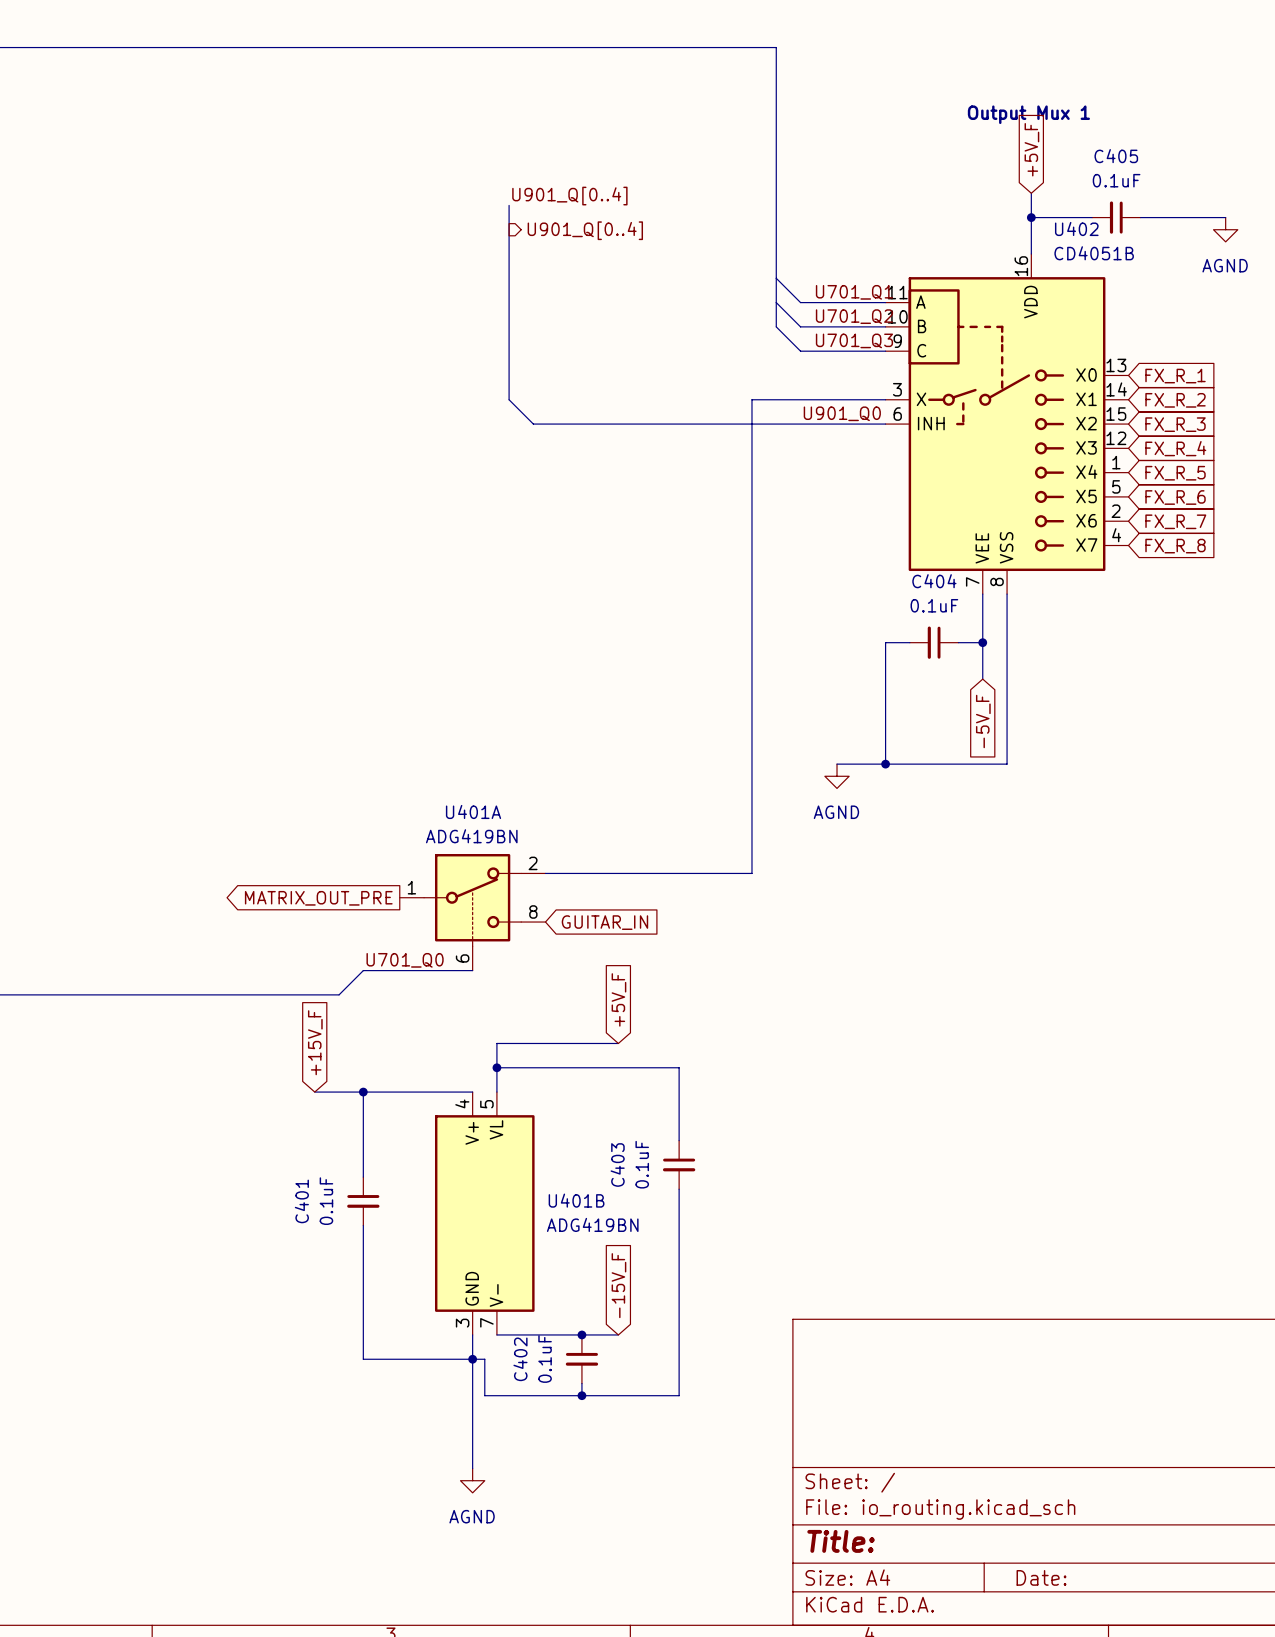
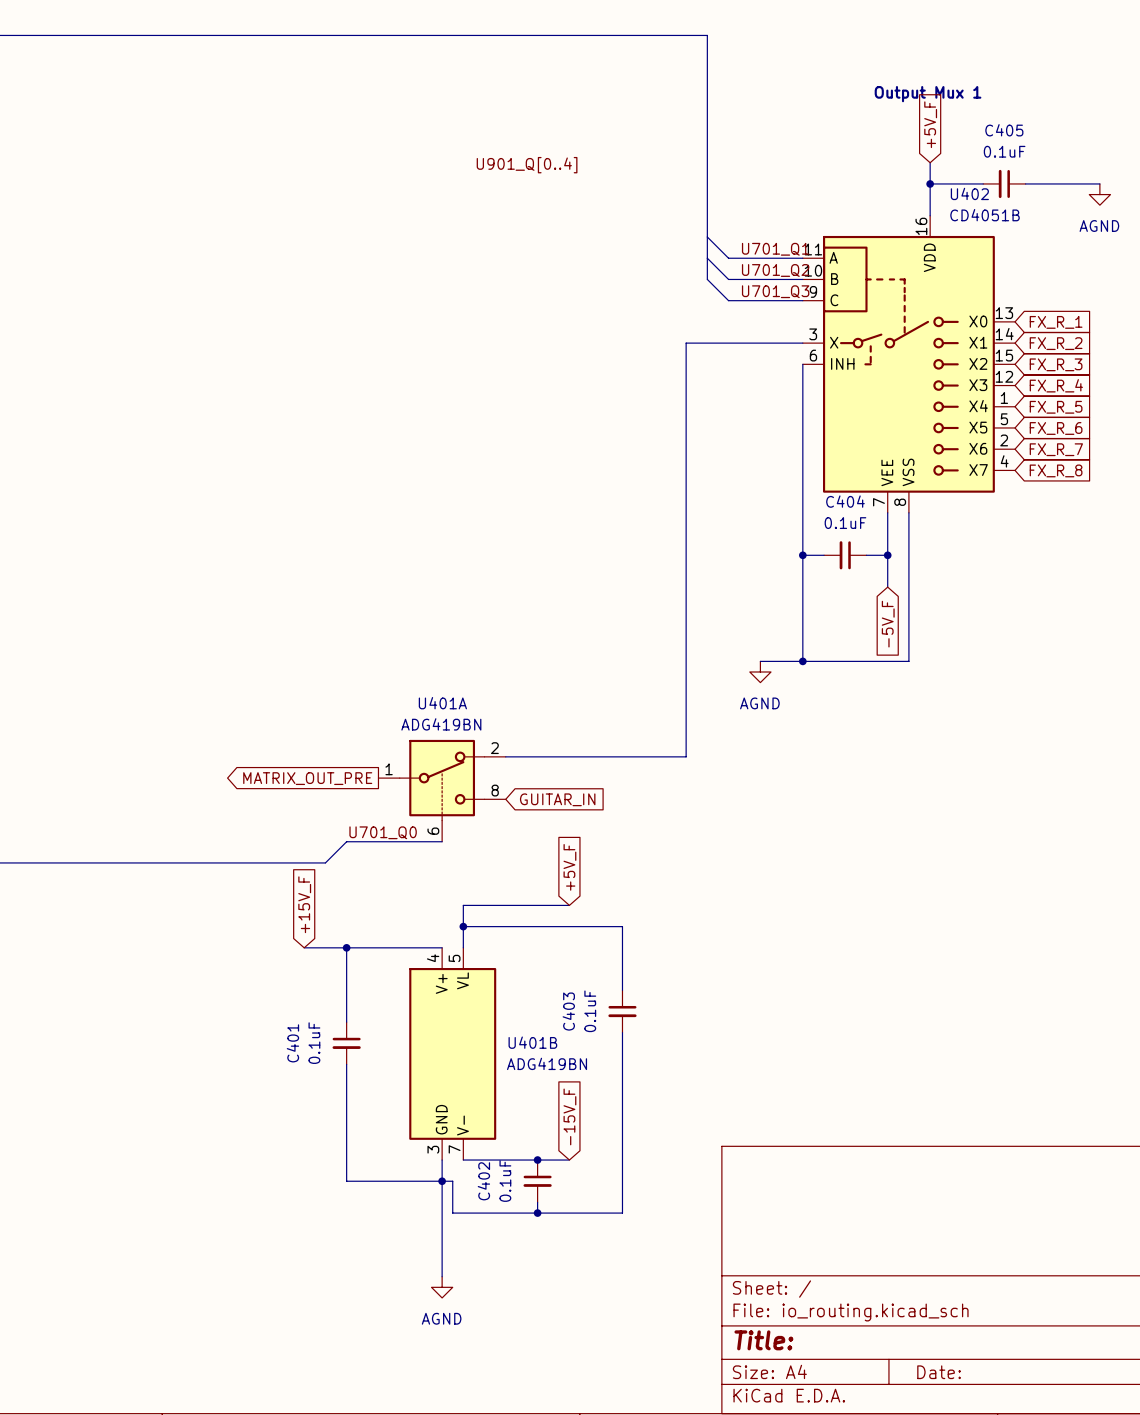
bus: (509, 205) (509, 399) -> none
hierarchical label: U901_Q[0..4] (585, 230) -> none
wire: (509, 399) (533, 424) (885, 424) -> (802, 555) (802, 364)
label: U901_Q0 (842, 413) -> none
junction: none -> (802, 555)

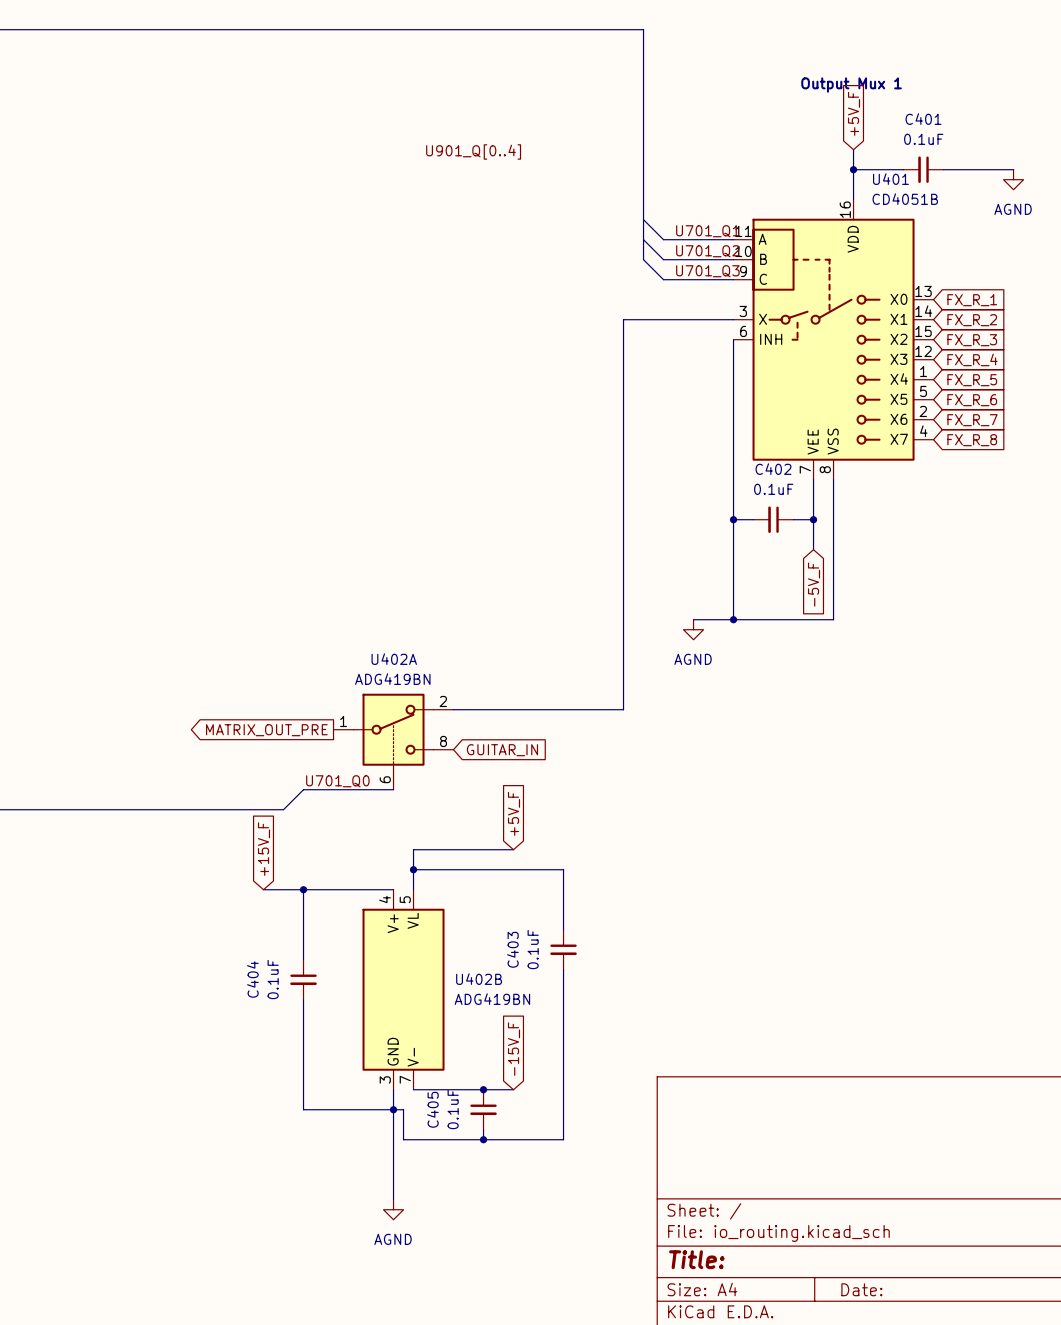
C405 name: C405 (1004, 130) -> C401 (923, 119)
U402 name: U402 (969, 193) -> U401 (890, 179)
C404 name: C404 (845, 501) -> C402 (773, 469)
U401A name: U401A (442, 703) -> U402A (394, 659)
U401B name: U401B (532, 1042) -> U402B (479, 979)
C401 name: C401 (292, 1043) -> C404 (252, 979)
C402 name: C402 (483, 1181) -> C405 (432, 1109)

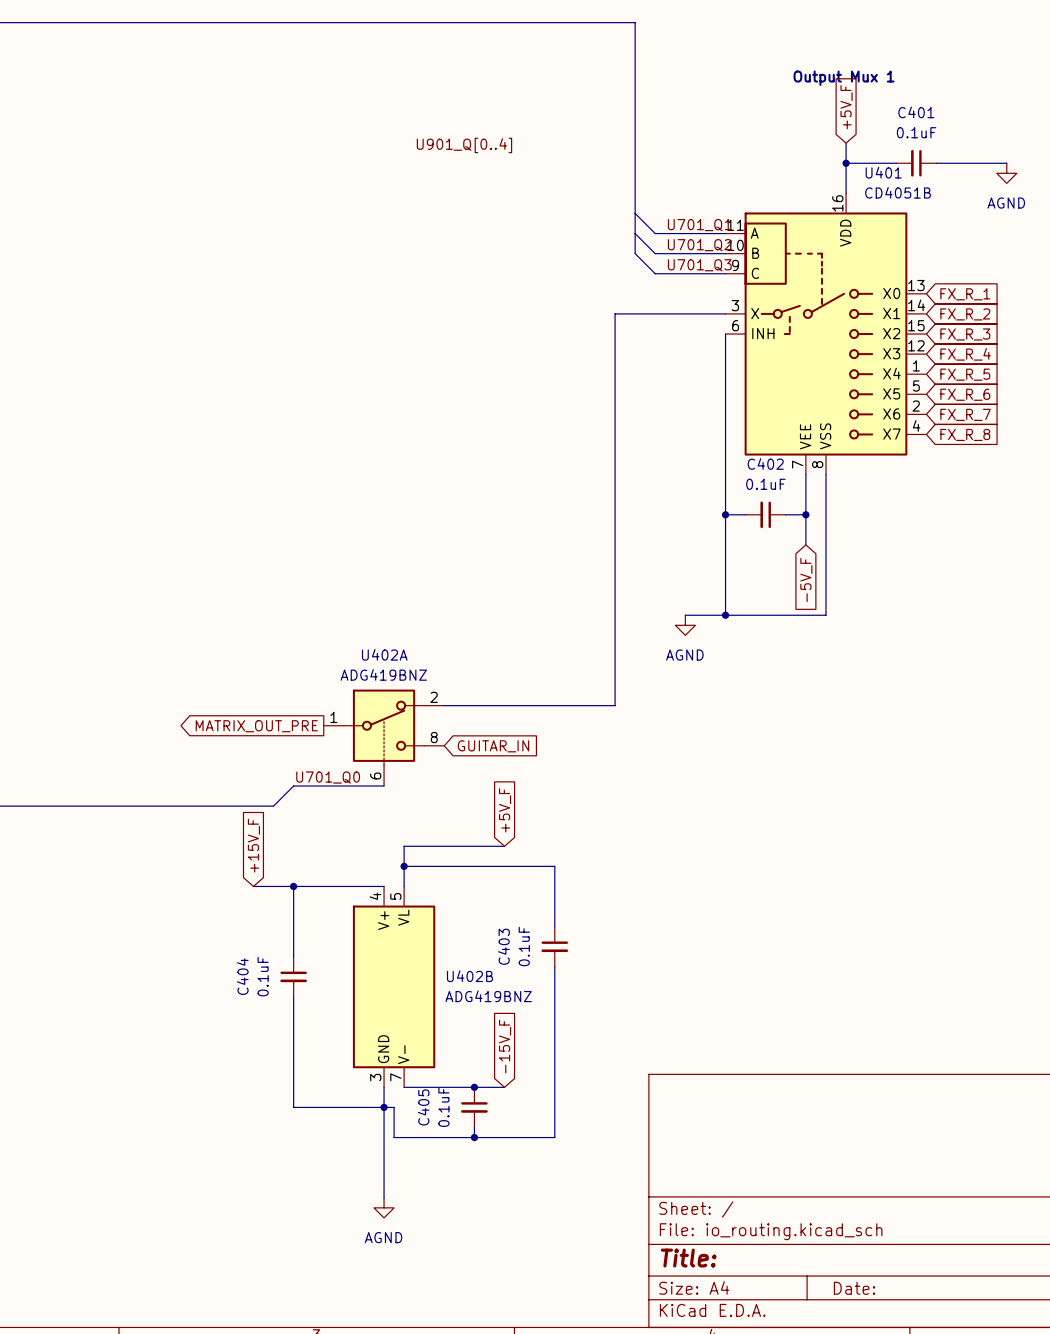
U402A value: ADG419BN (392, 679) -> ADG419BNZ (383, 674)
U402B value: ADG419BN (492, 999) -> ADG419BNZ (488, 996)

